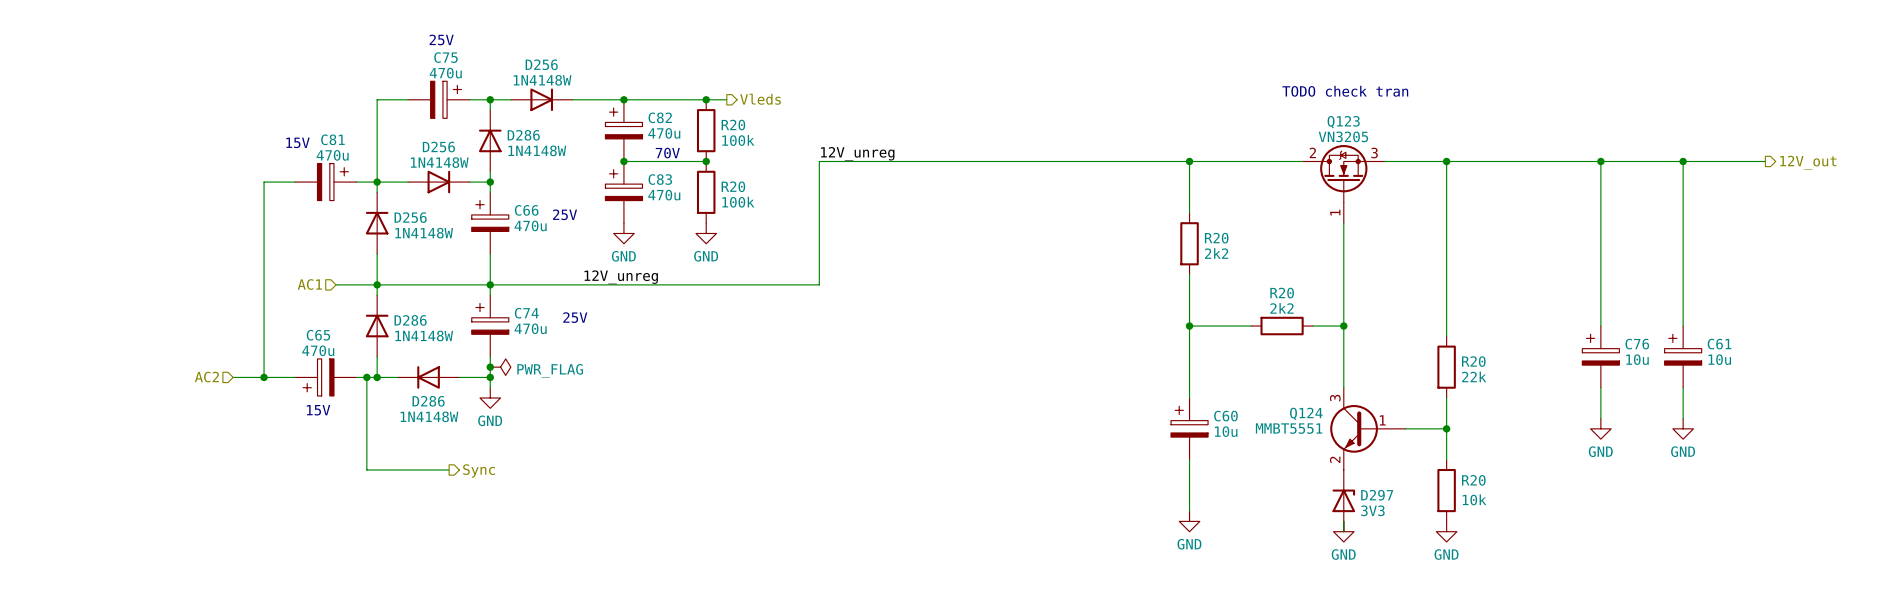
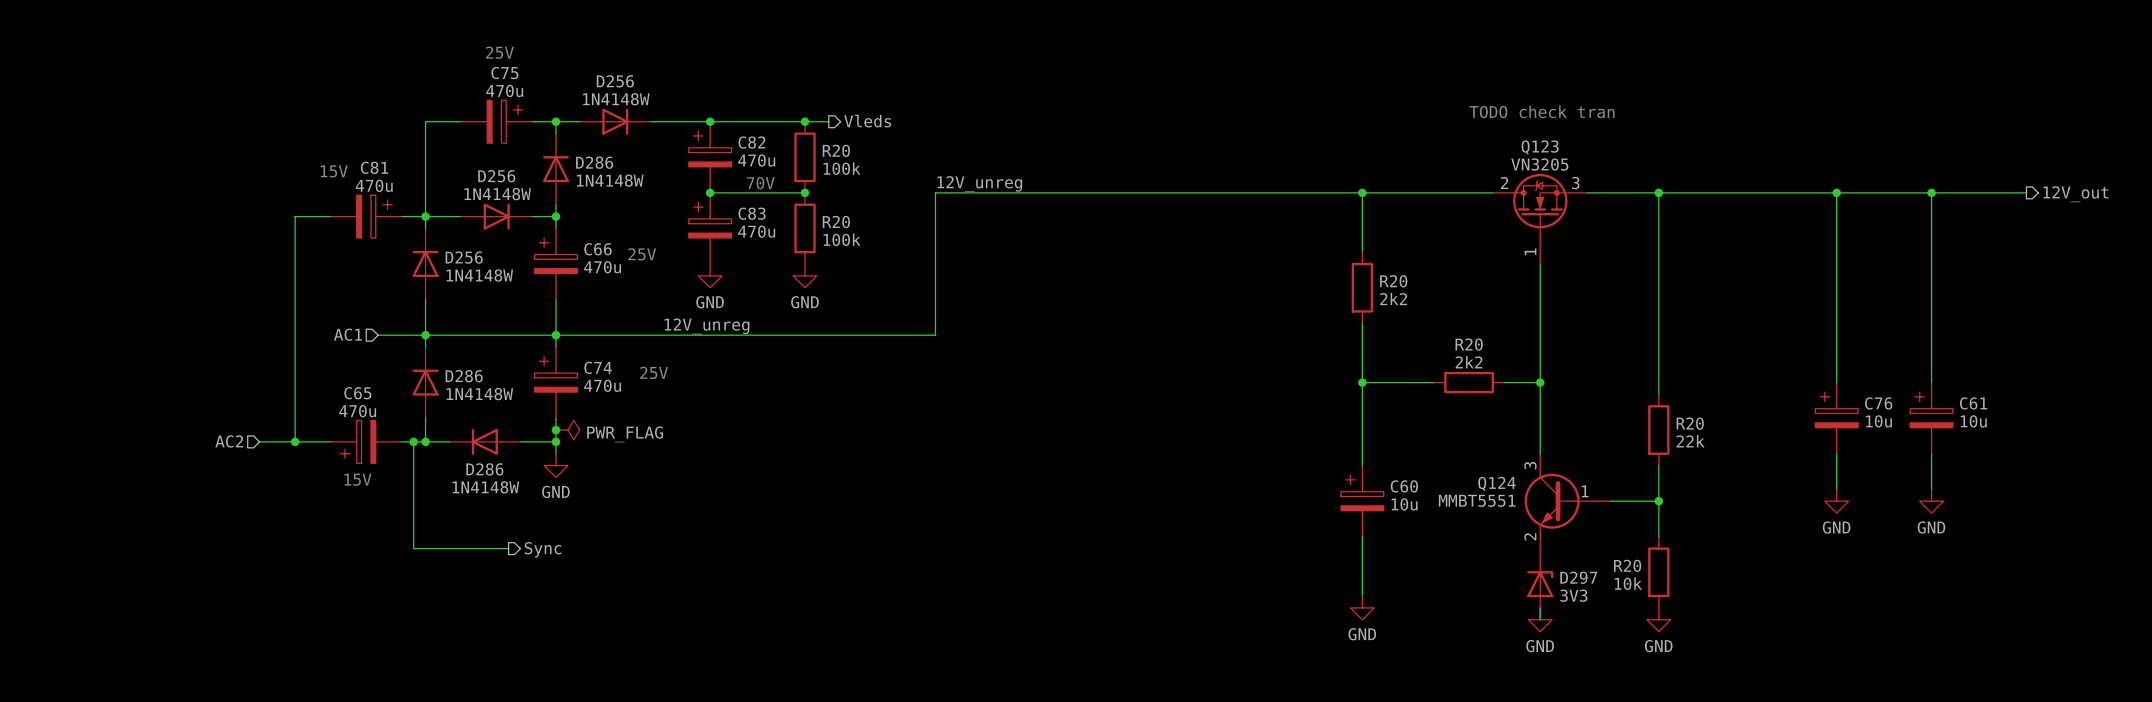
R20 name position: R20 (1473, 480) -> R20 (1627, 565)
R20 value position: 10k (1474, 499) -> 10k (1628, 583)

